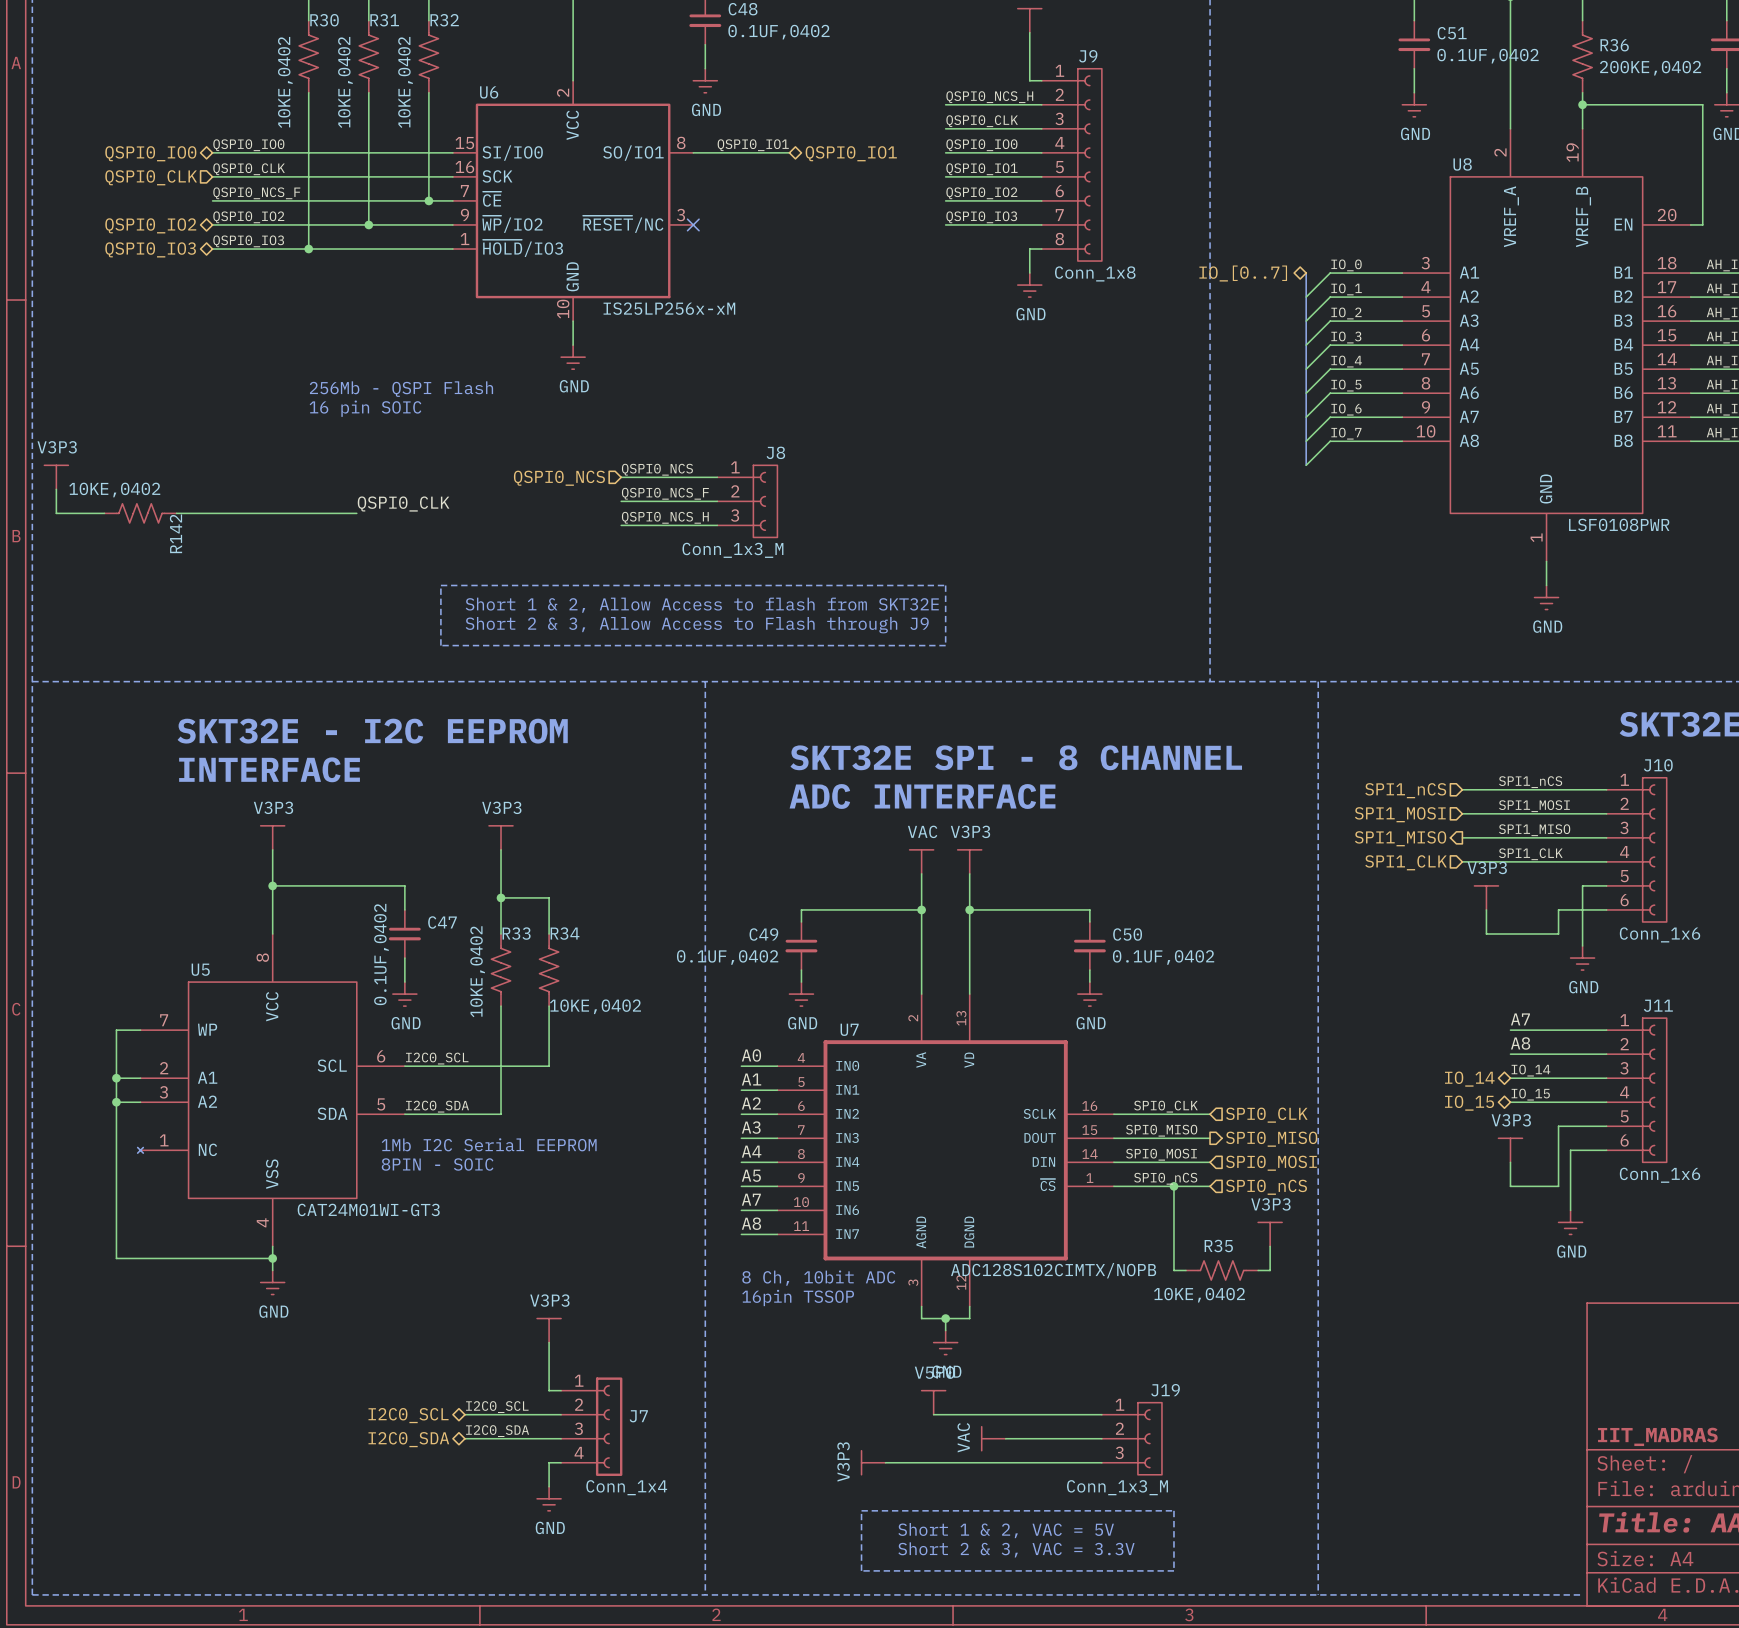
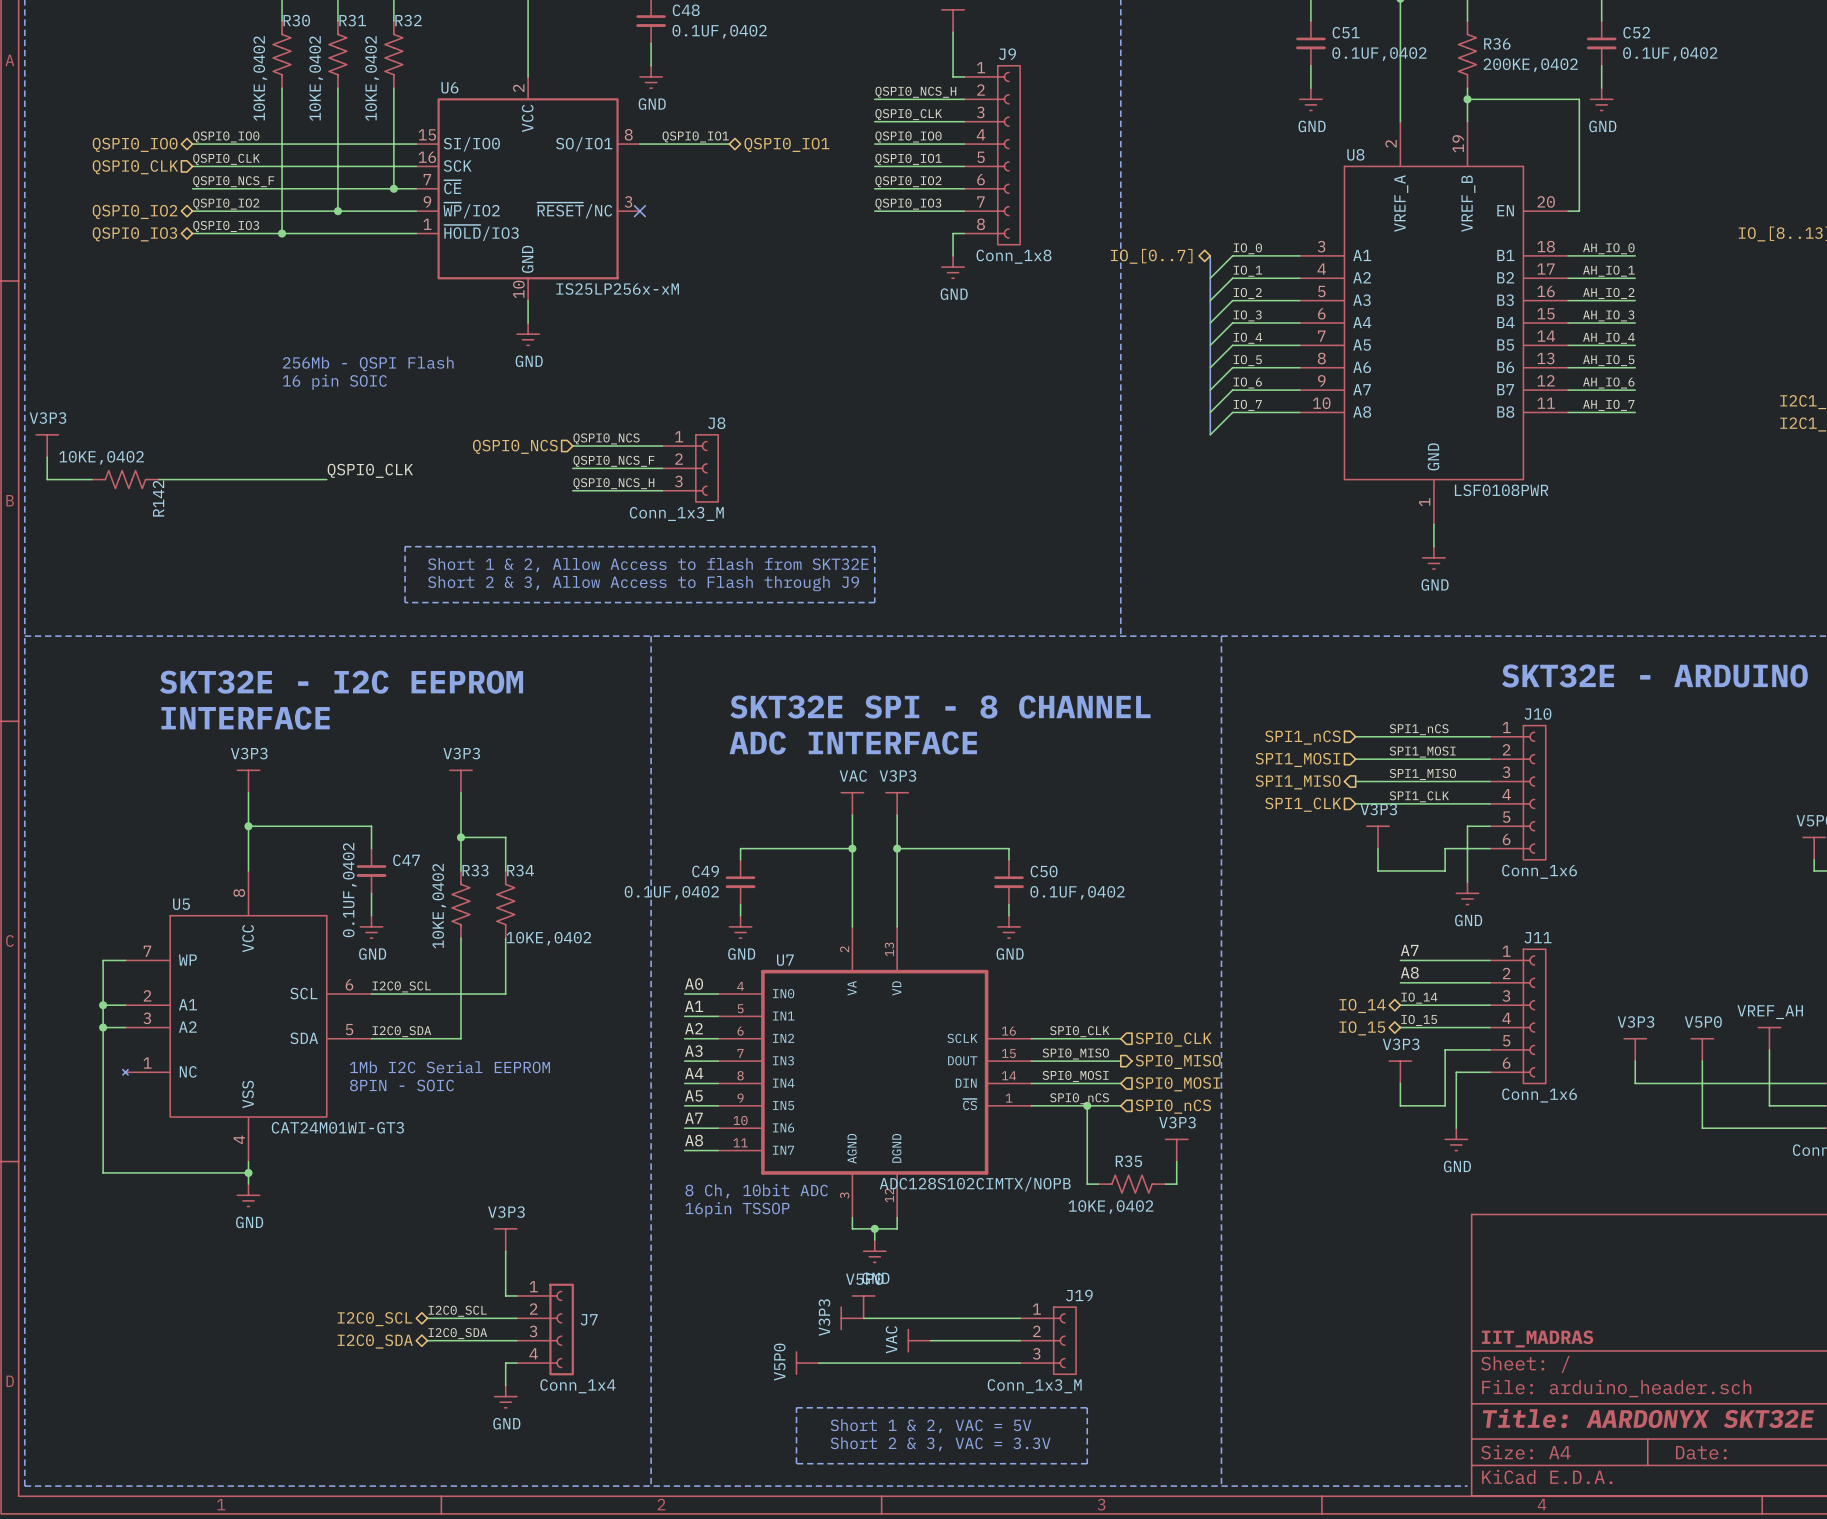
power symbol: none -> V3P3 (852, 1318)
power symbol: V3P3 (873, 1462) -> V5P0 (807, 1363)

